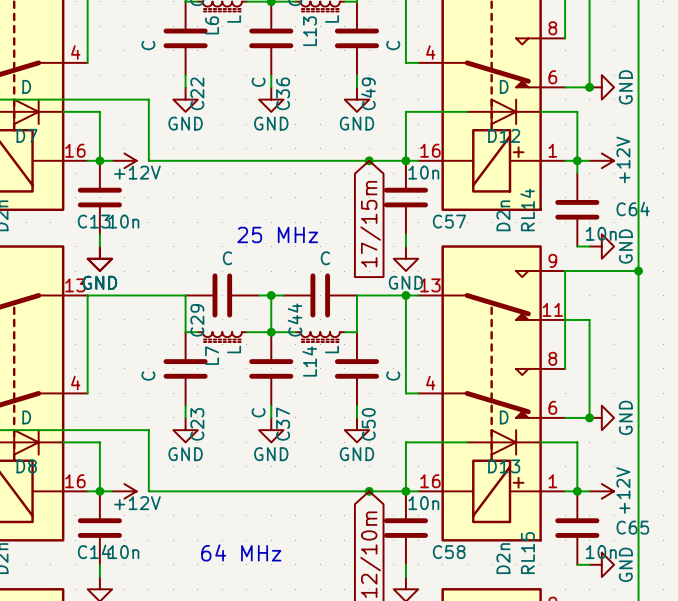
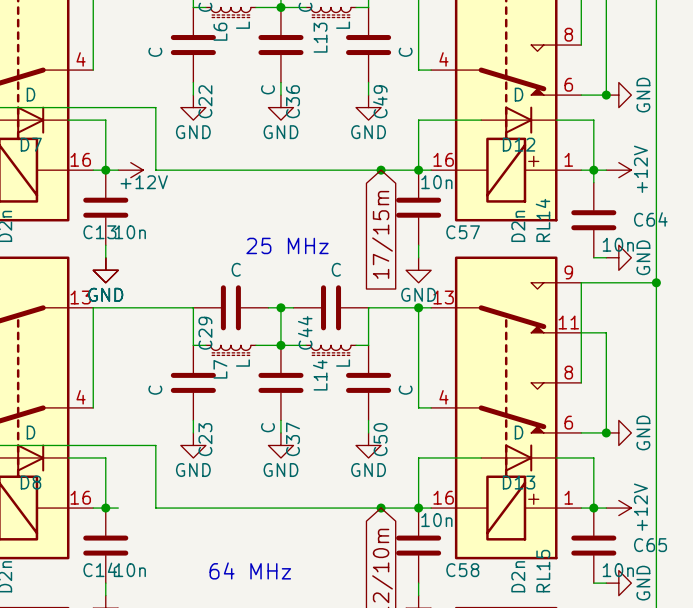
power symbol: +12V (124, 491) -> none

